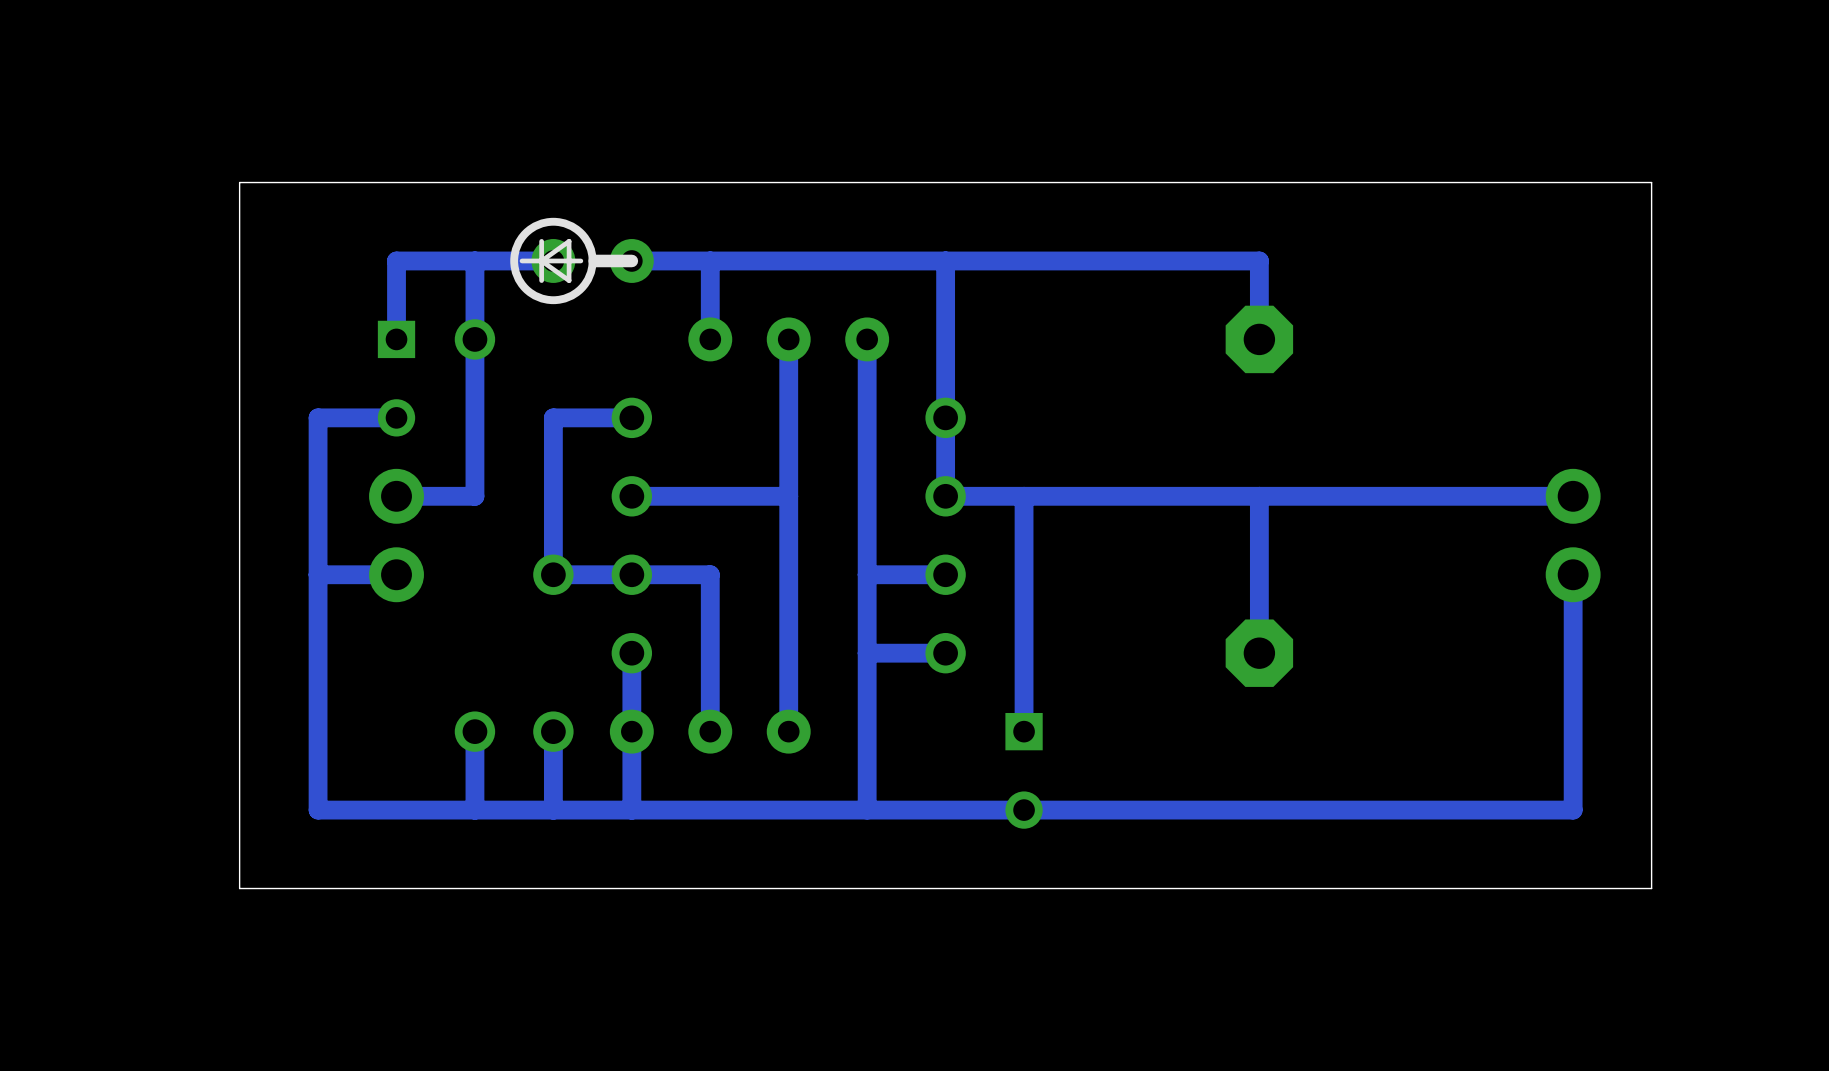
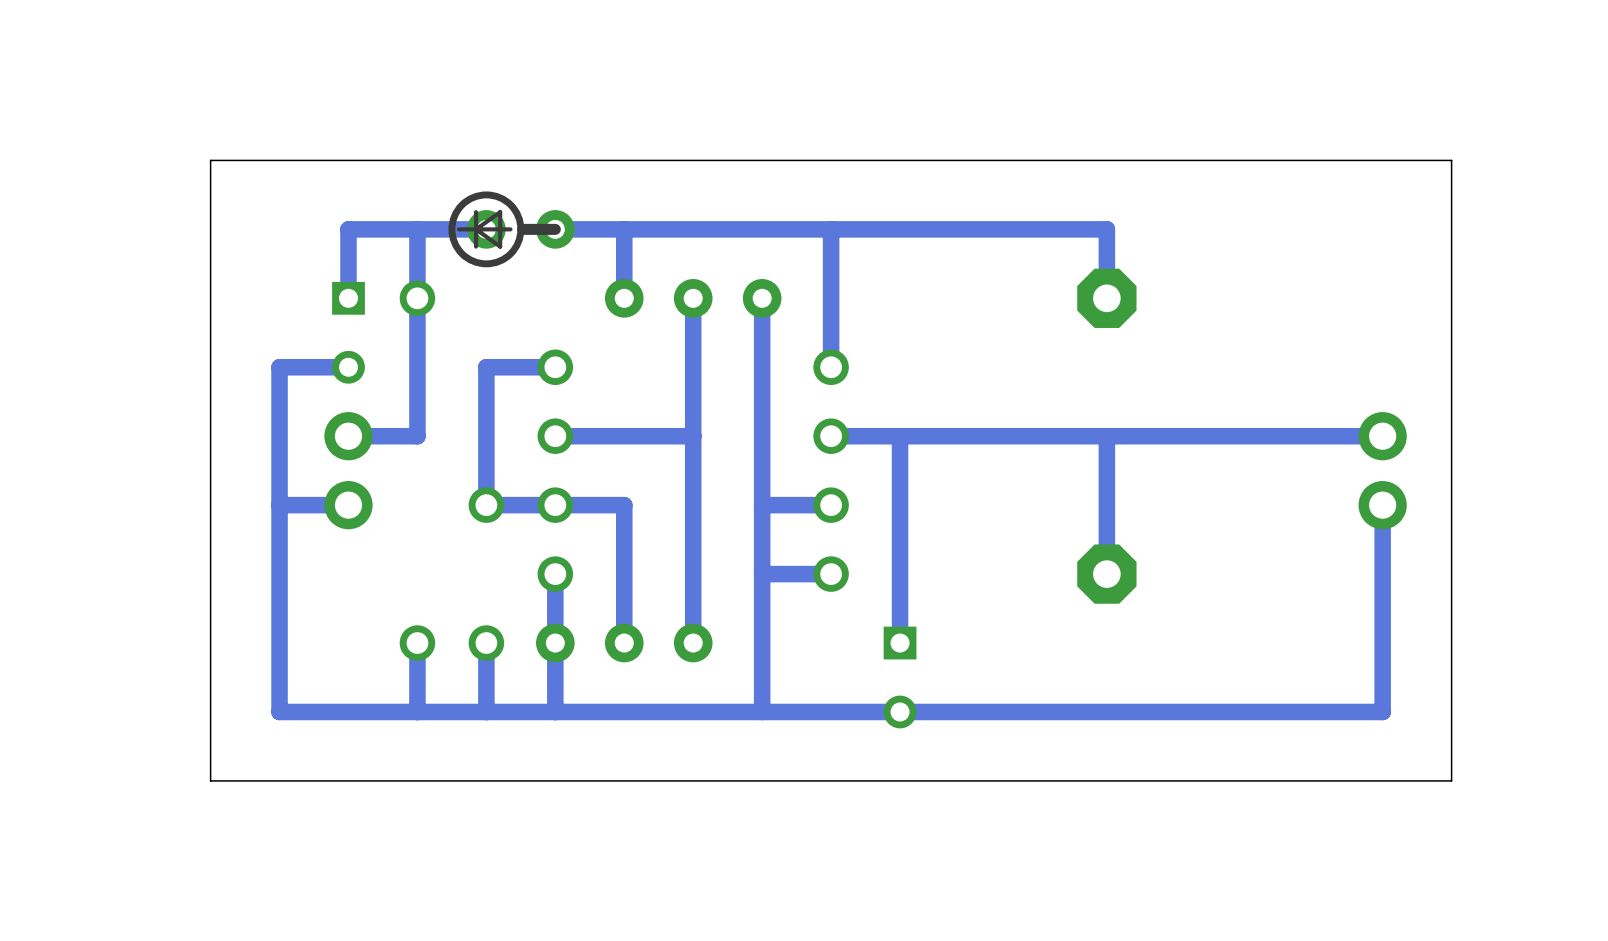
bottom track: (945, 417) (945, 496) -> none

